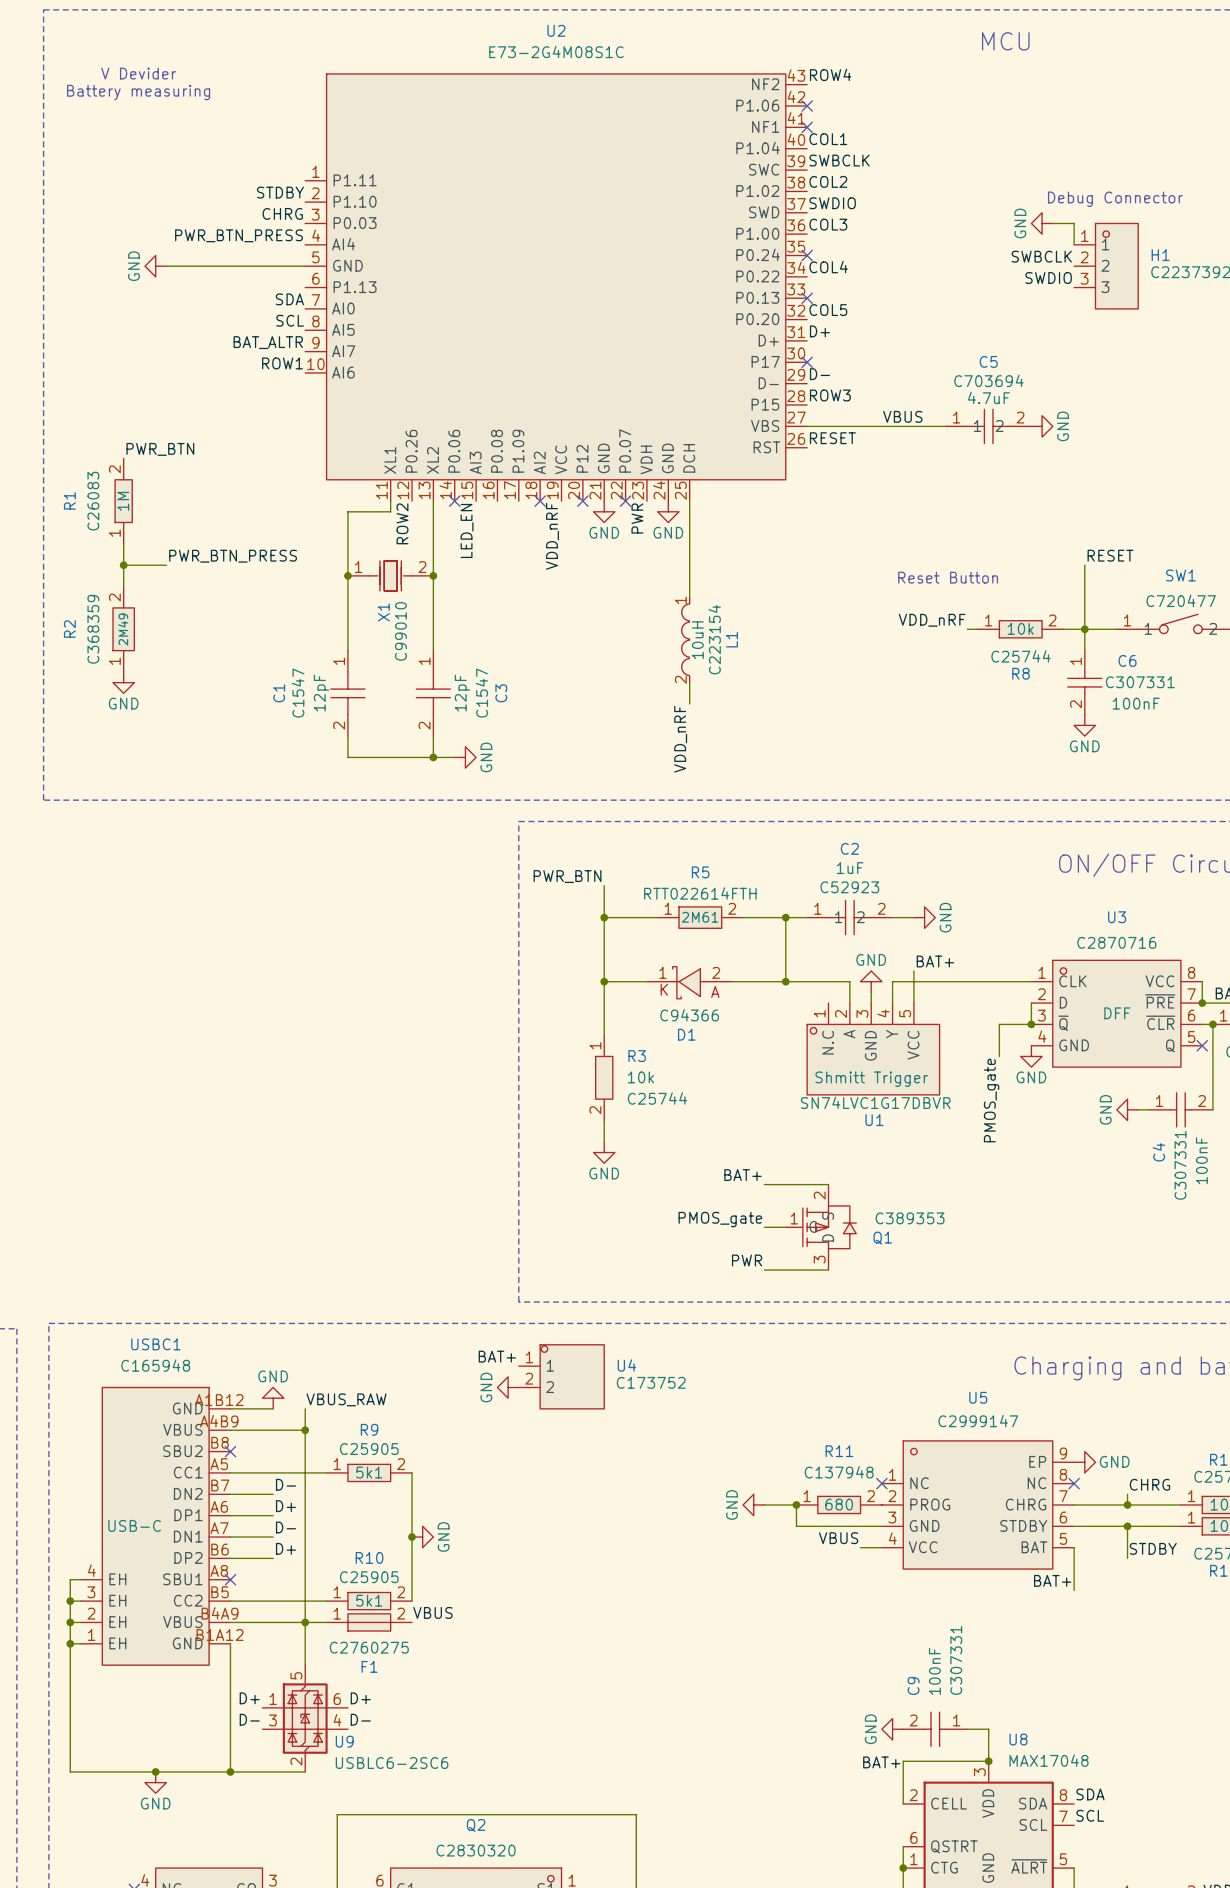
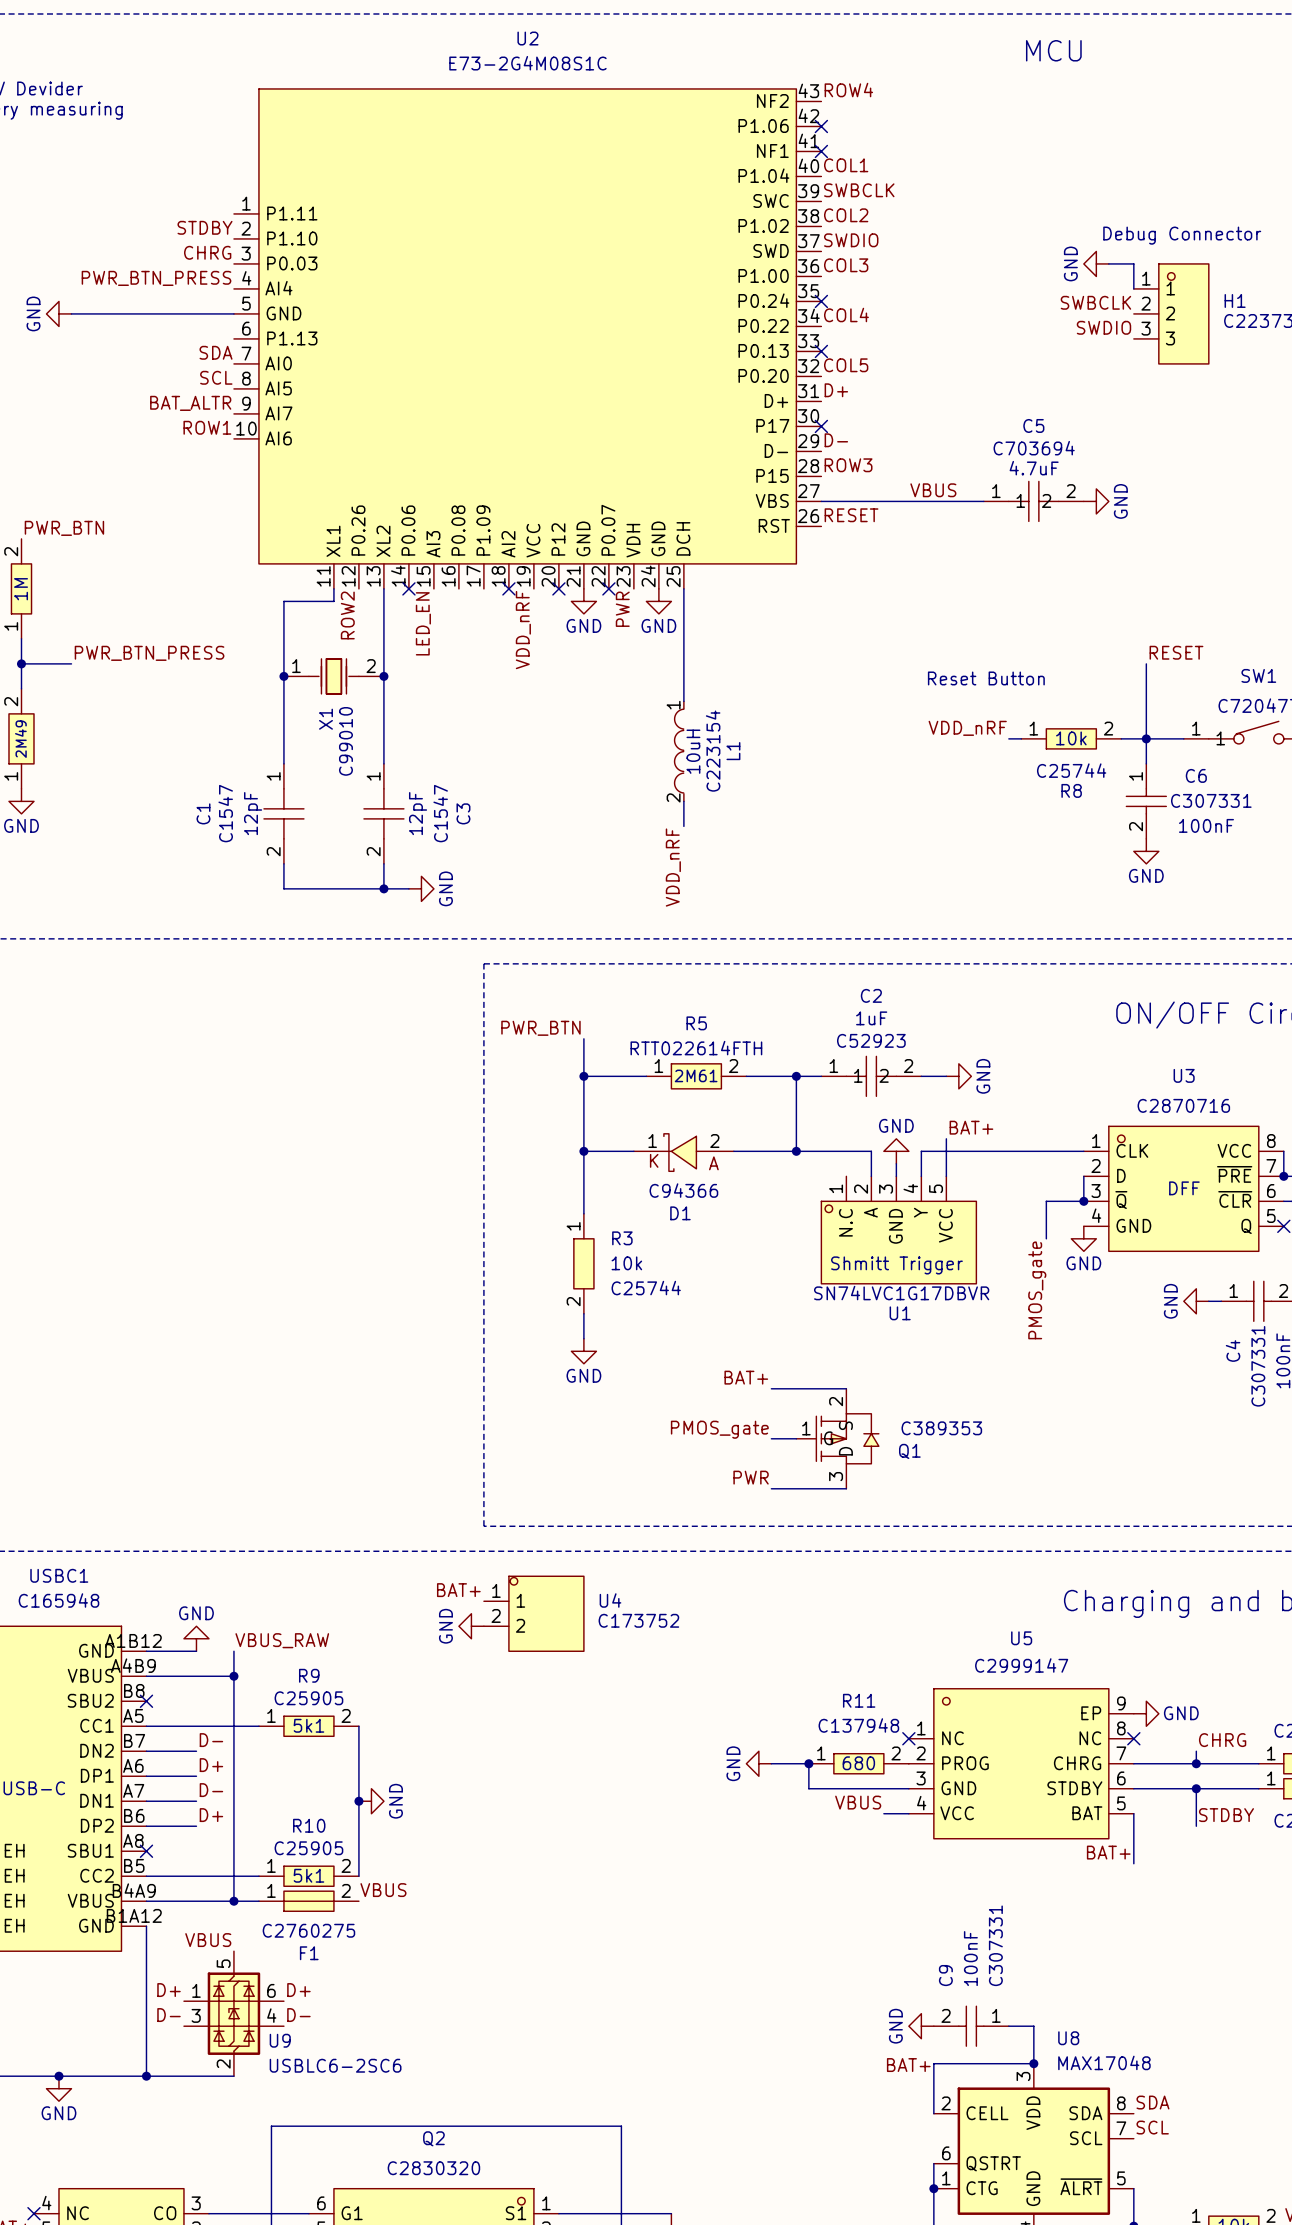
wire: (305, 1622) (305, 1665) -> none
label: none -> VBUS (208, 1940)

